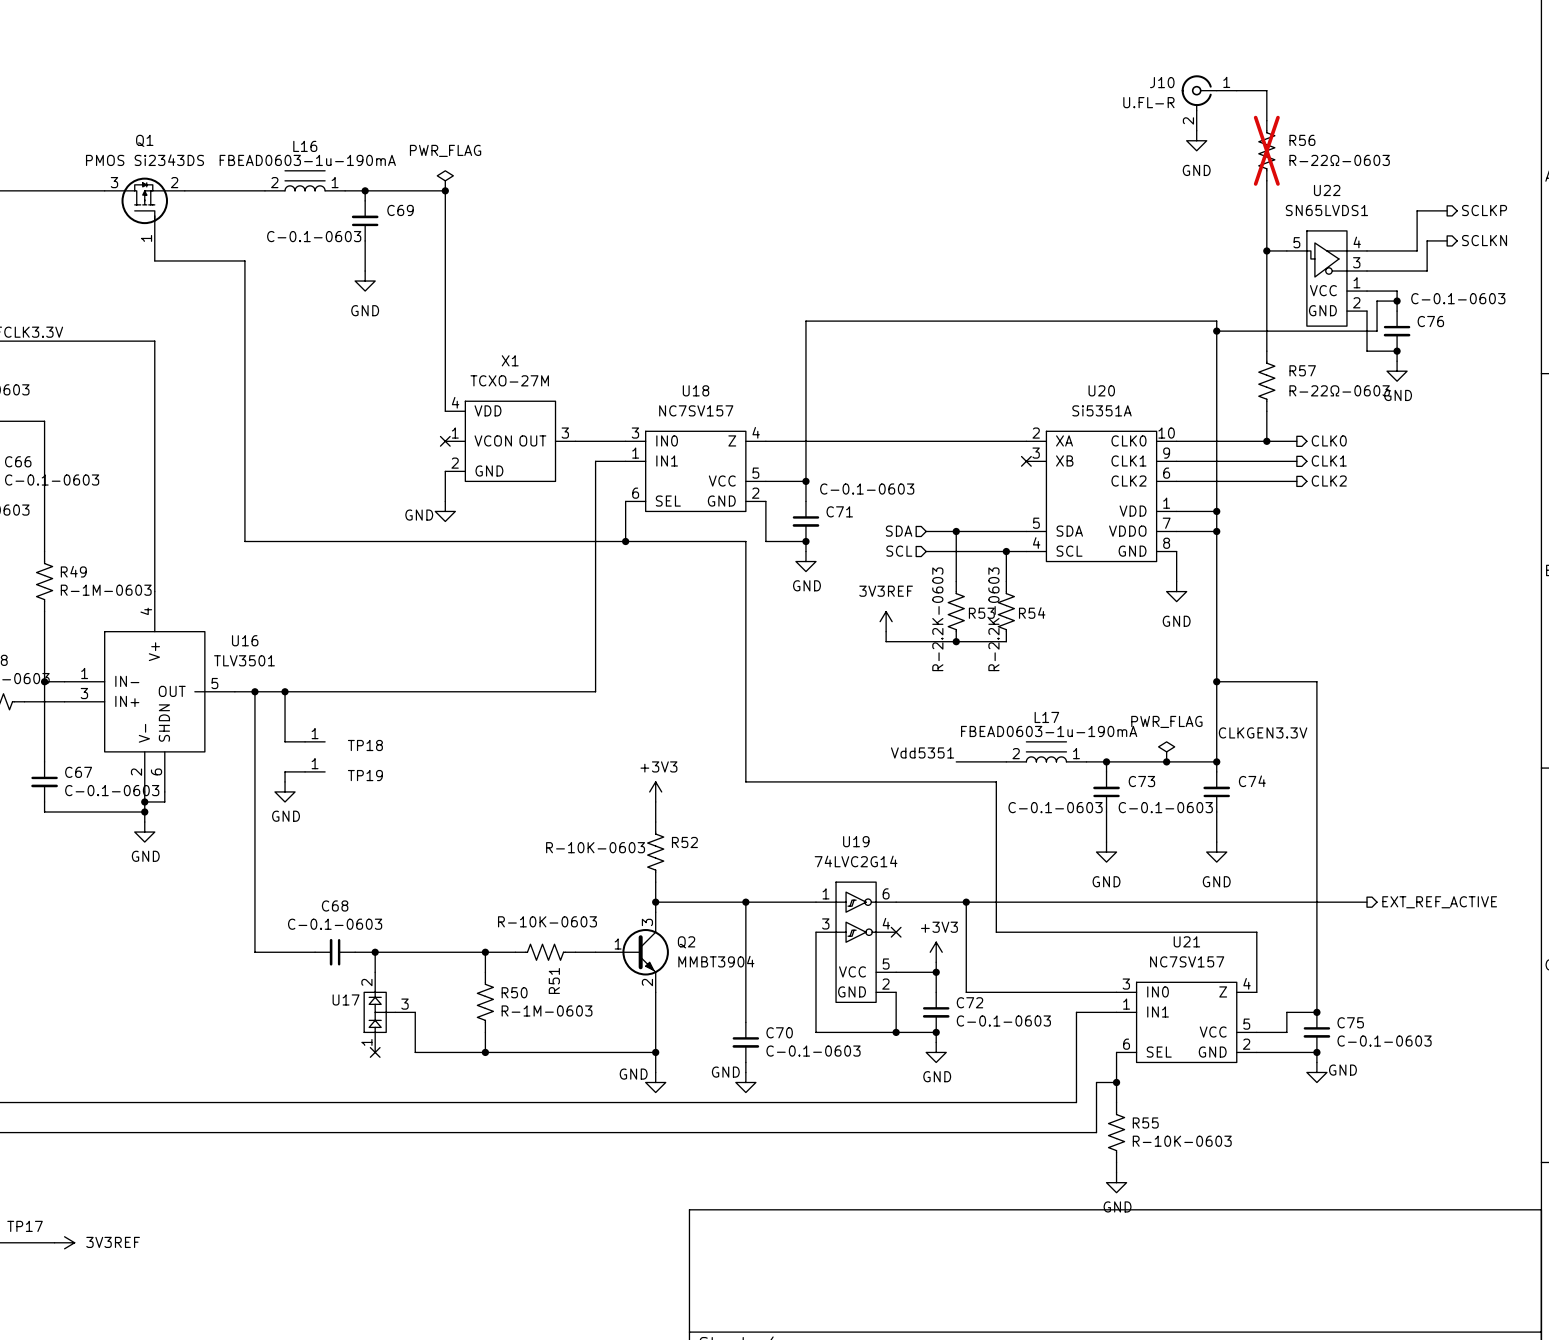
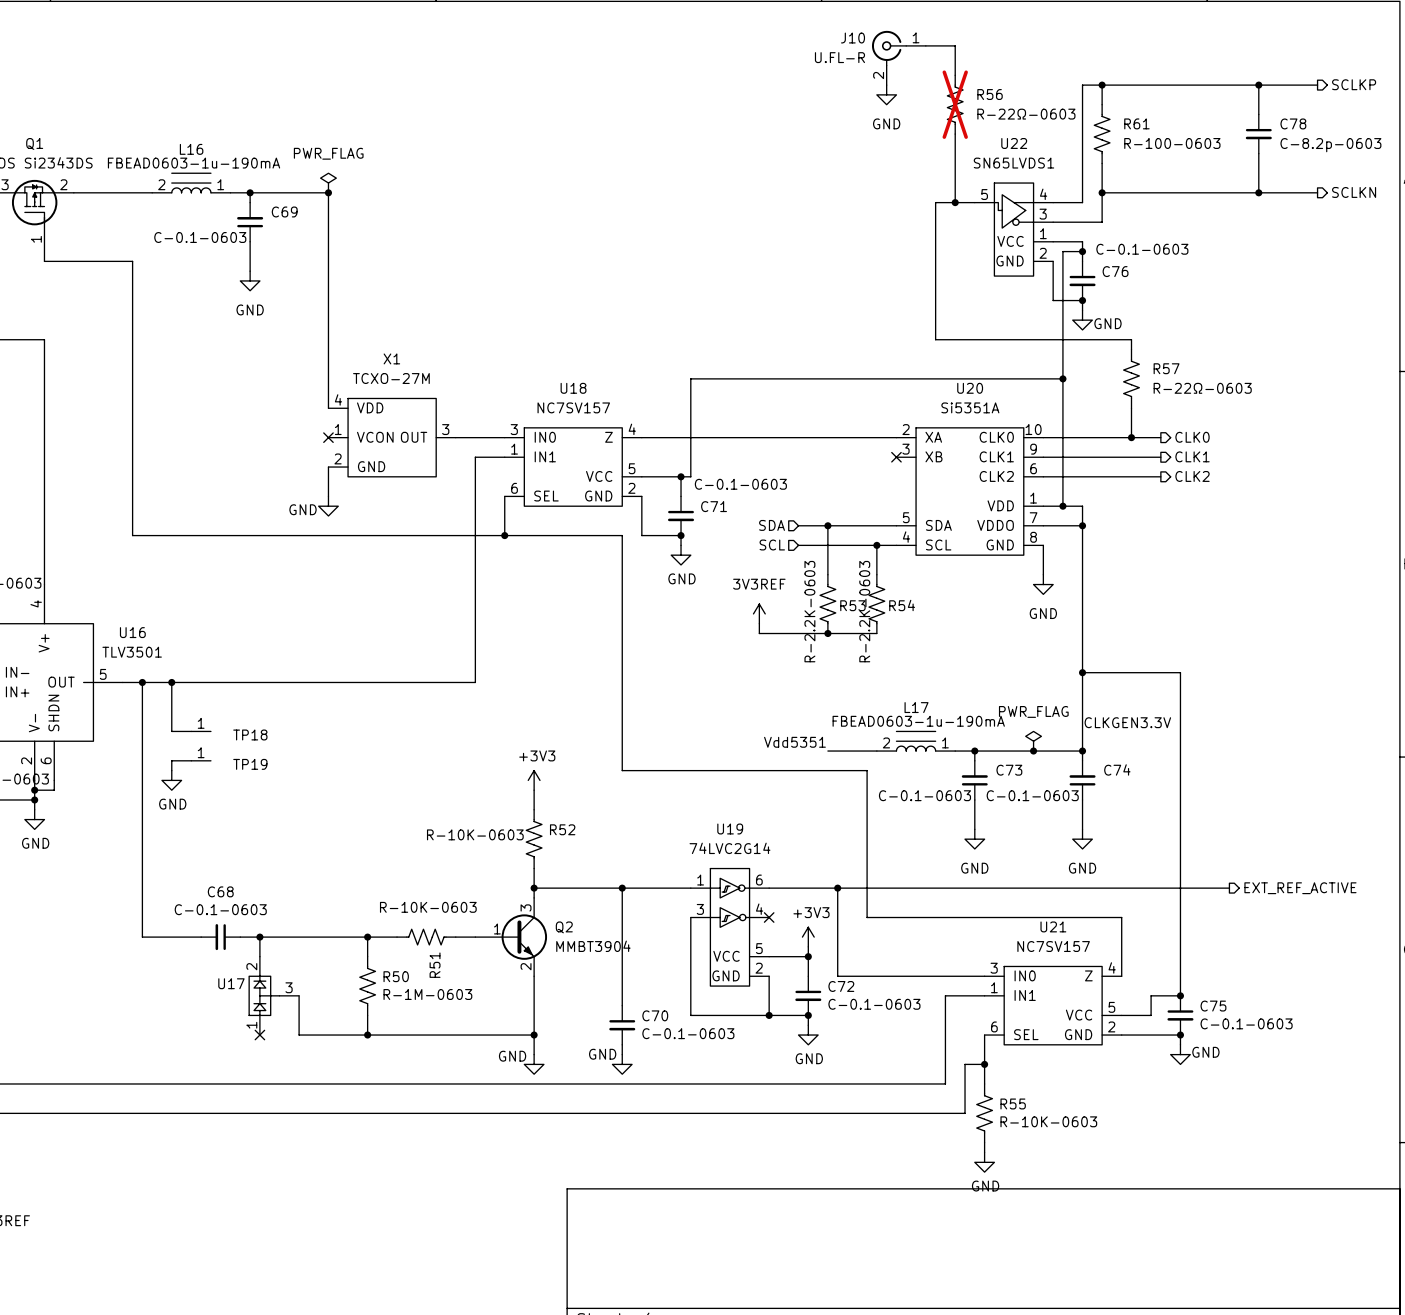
wire: none -> (1102, 85) (1102, 104)
junction: none -> (1102, 85)
wire: none -> (1258, 85) (1258, 114)
junction: none -> (1258, 85)
wire: none -> (1317, 85) (1082, 85) (1082, 202) (1053, 202)
power symbol: none -> GND (886, 94)
wire: (1236, 90) (1266, 90) (1266, 120) -> (925, 45) (955, 45) (955, 75)
J10 position: (1209, 103) -> (898, 57)
wire: none -> (955, 134) (955, 202)
R61: none -> R-100-0603 (1102, 134)
C78: none -> C-8.2p-0603 (1258, 134)
power symbol: GND (1196, 140) -> none
R56 position: (1266, 150) -> (955, 104)
wire: none -> (1258, 153) (1258, 192)
wire: none -> (1102, 163) (1102, 222) (1053, 222)
wire: (1266, 180) (1266, 341) -> (974, 202) (935, 202) (935, 339) (1131, 339)
wire: none -> (1102, 192) (1317, 192)
junction: none -> (1102, 192)
junction: none -> (1258, 192)
junction: none -> (955, 202)
wire: (1447, 210) (1417, 210) (1417, 250) (1367, 250) -> none
hierarchical label position: SCLKP (1484, 210) -> SCLKP (1354, 84)
wire: (1447, 240) (1427, 240) (1427, 271) (1367, 271) -> none
hierarchical label position: SCLKN (1484, 240) -> SCLKN (1354, 192)
wire: none -> (1082, 251) (1062, 251) (1062, 506)
junction: none -> (1082, 251)
wire: (1266, 250) (1286, 250) -> none
junction: (1266, 250) -> none
U22 position: (1326, 278) -> (1013, 229)
wire: (1367, 291) (1397, 291) (1397, 311) -> (1053, 241) (1082, 241) (1082, 261)
junction: none -> (1082, 300)
wire: (1397, 301) (1377, 301) (1377, 331) (1216, 331) -> none
junction: (1397, 301) -> none
wire: (1367, 311) (1367, 351) (1397, 351) (1397, 361) -> (1053, 261) (1053, 300) (1082, 300) (1082, 310)
power symbol: none -> GND (1082, 320)
junction: (1216, 331) -> none
C76 position: (1397, 331) -> (1082, 280)
junction: (1397, 351) -> none
power symbol: GND (1397, 371) -> none
junction: none -> (1062, 378)
wire: (805, 481) (805, 321) (1216, 321) (1216, 511) -> (681, 476) (690, 476) (690, 378) (1062, 378)
junction position: (1216, 511) -> (1062, 506)

